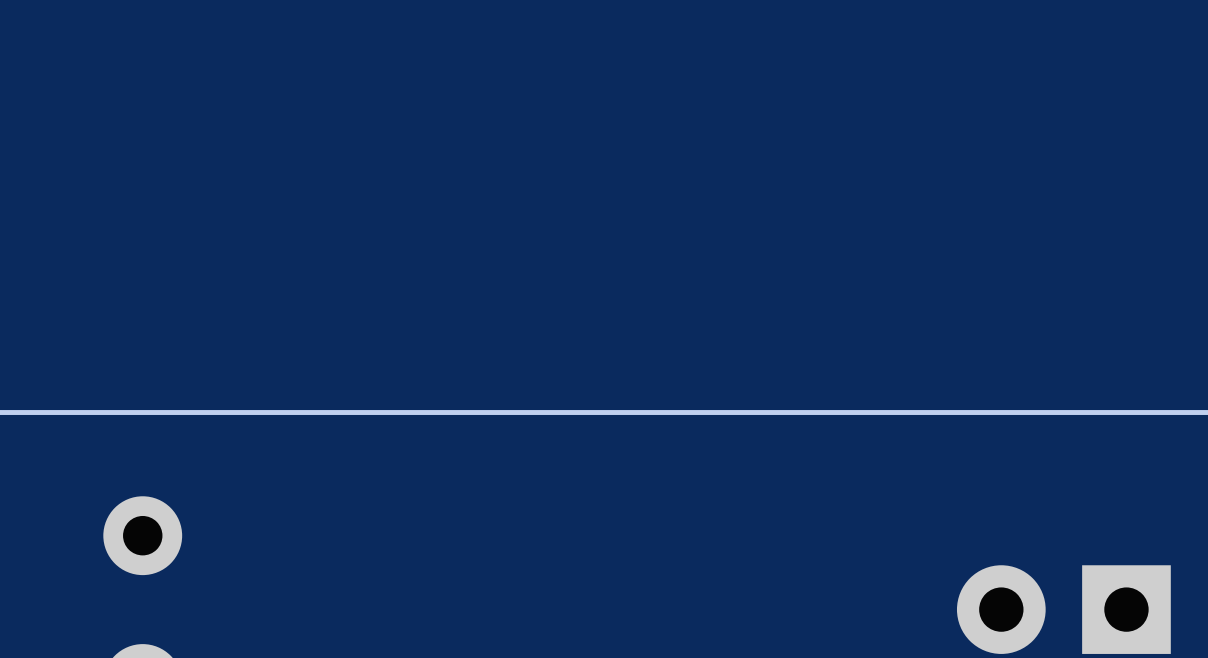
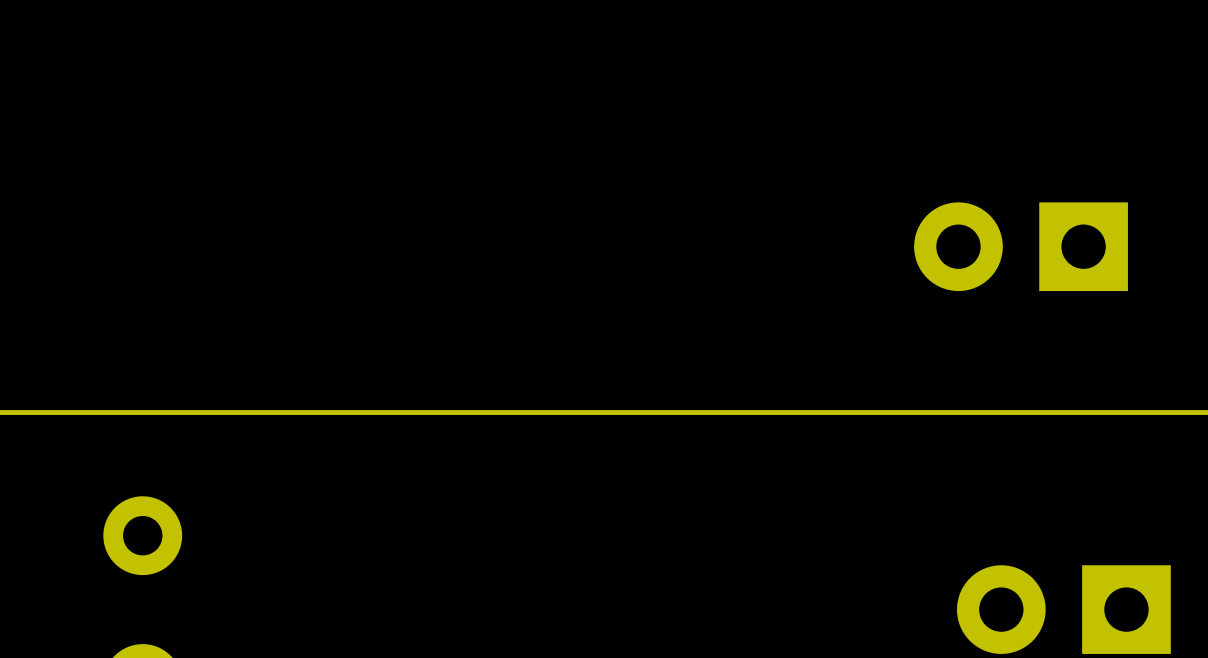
part: none -> (1021, 246)

